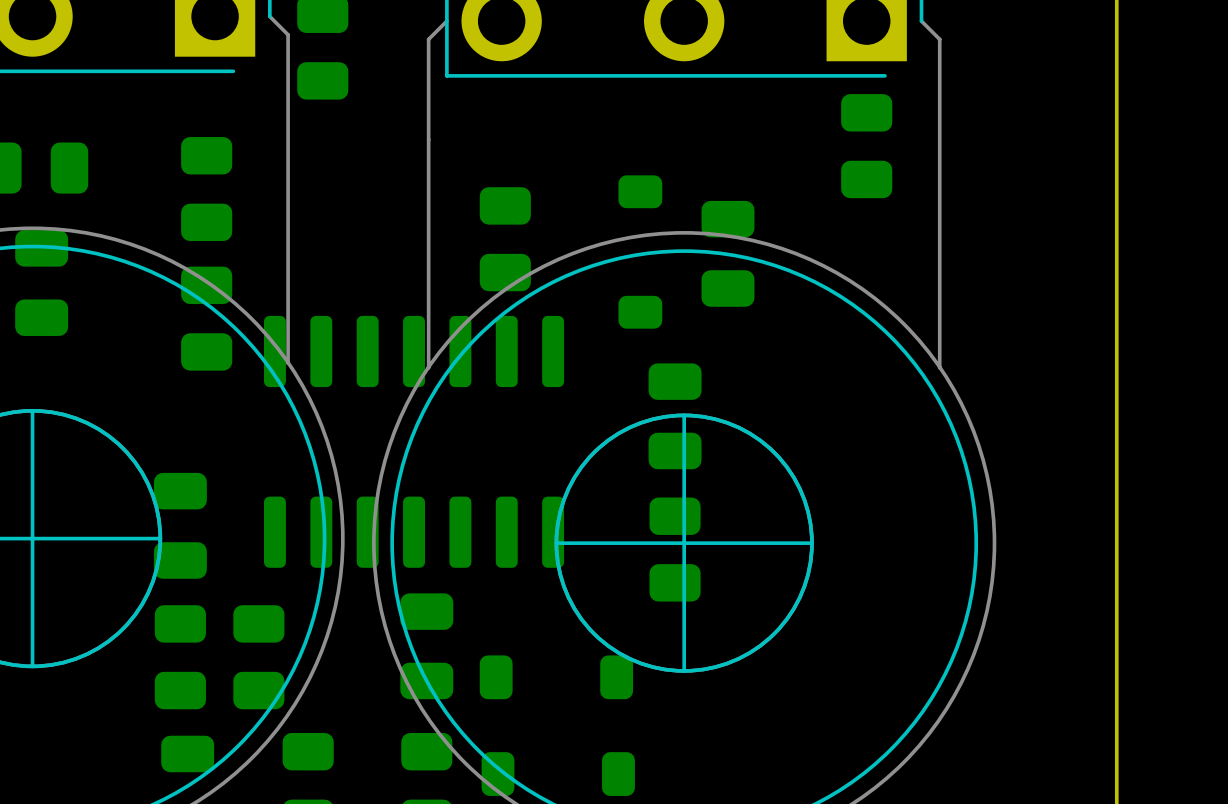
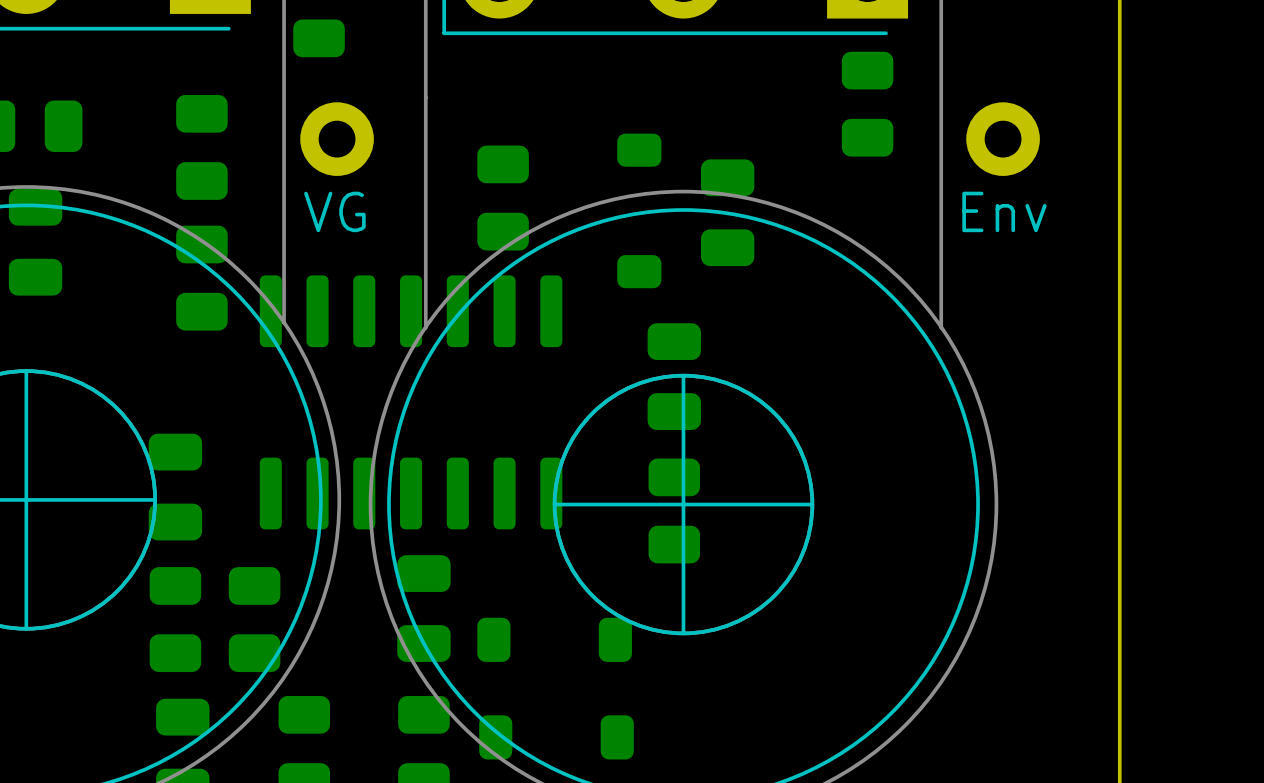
part: none -> VG (337, 139)
part: none -> Env (1003, 139)

